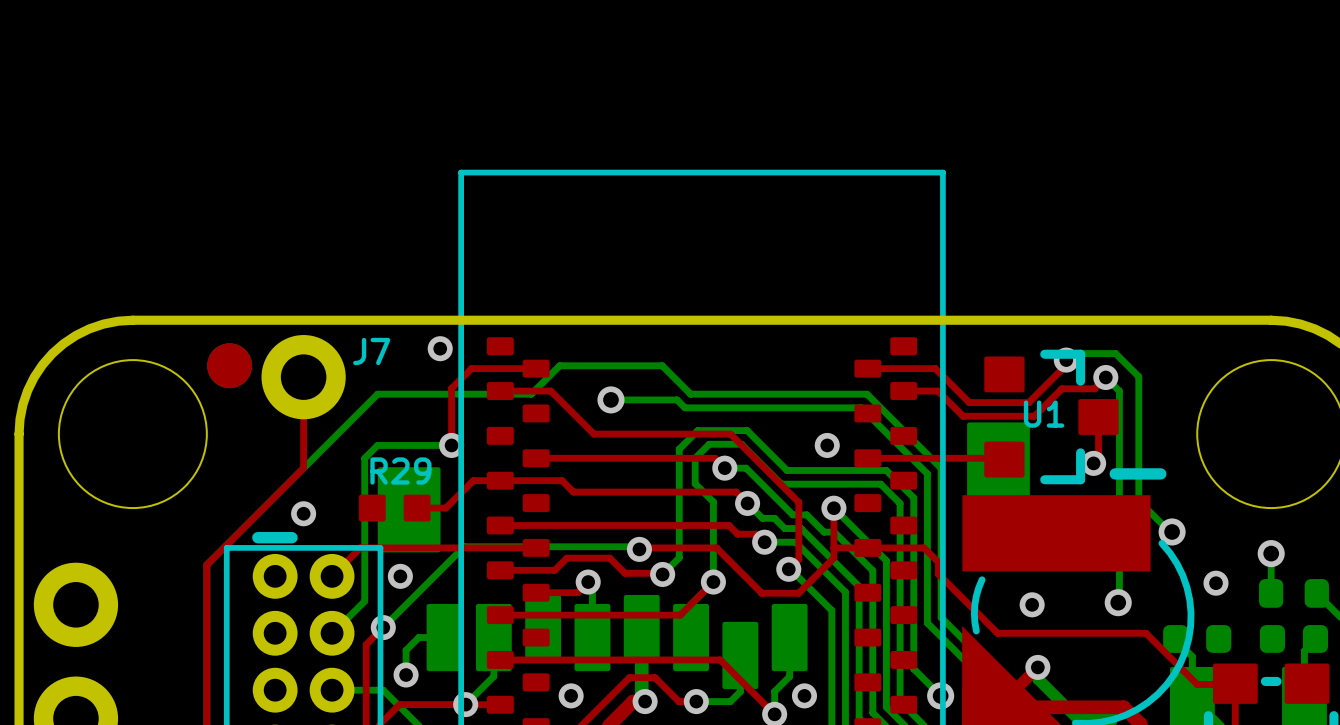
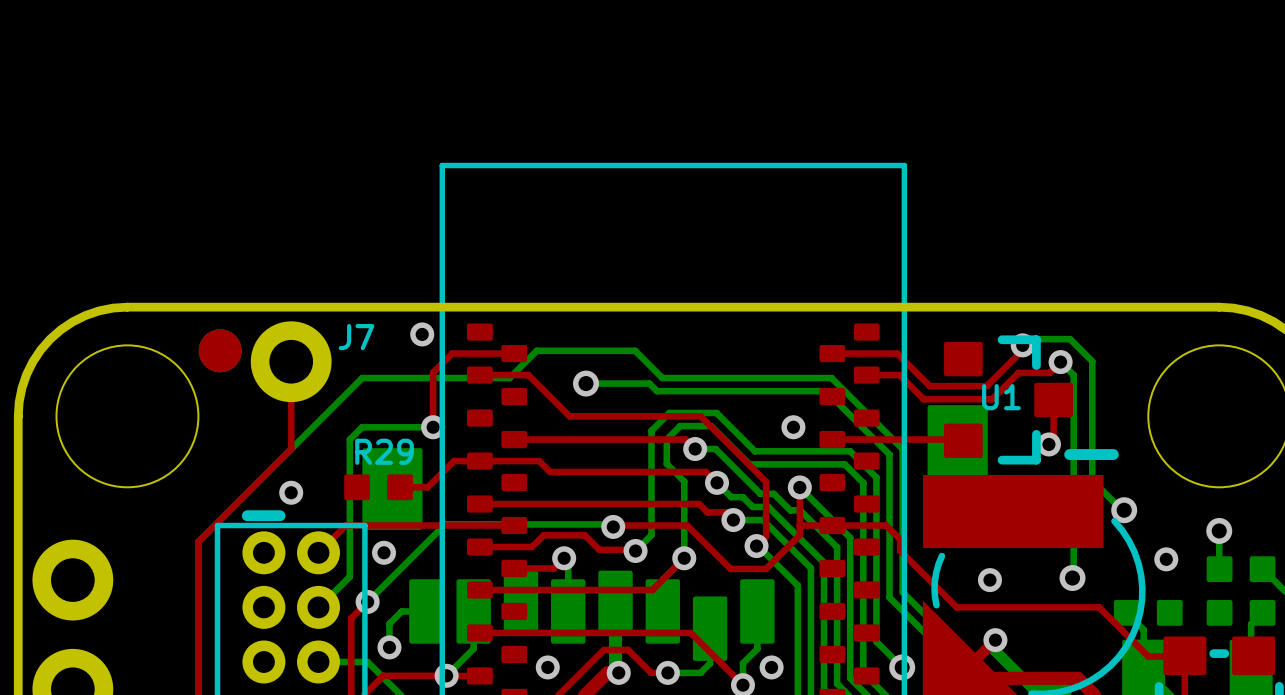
part footprint: [1259, 579, 1329, 608] -> [1206, 556, 1276, 583]
part footprint: [1163, 625, 1232, 653] -> [1113, 599, 1183, 626]
part footprint: [1259, 625, 1329, 653] -> [1206, 599, 1276, 626]

